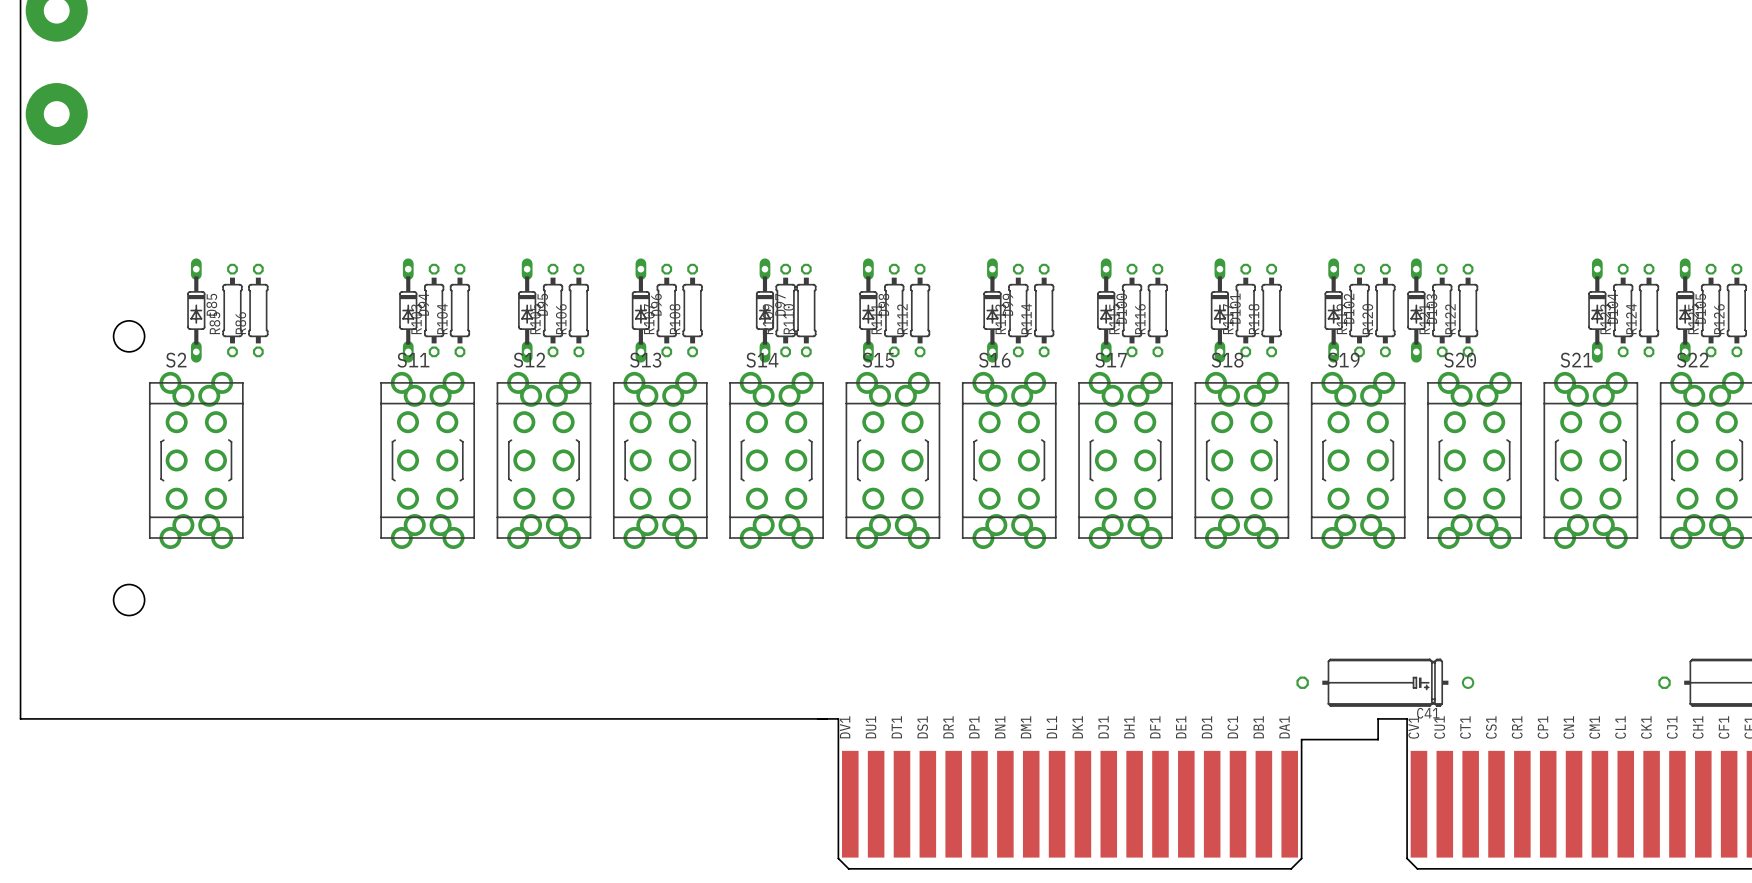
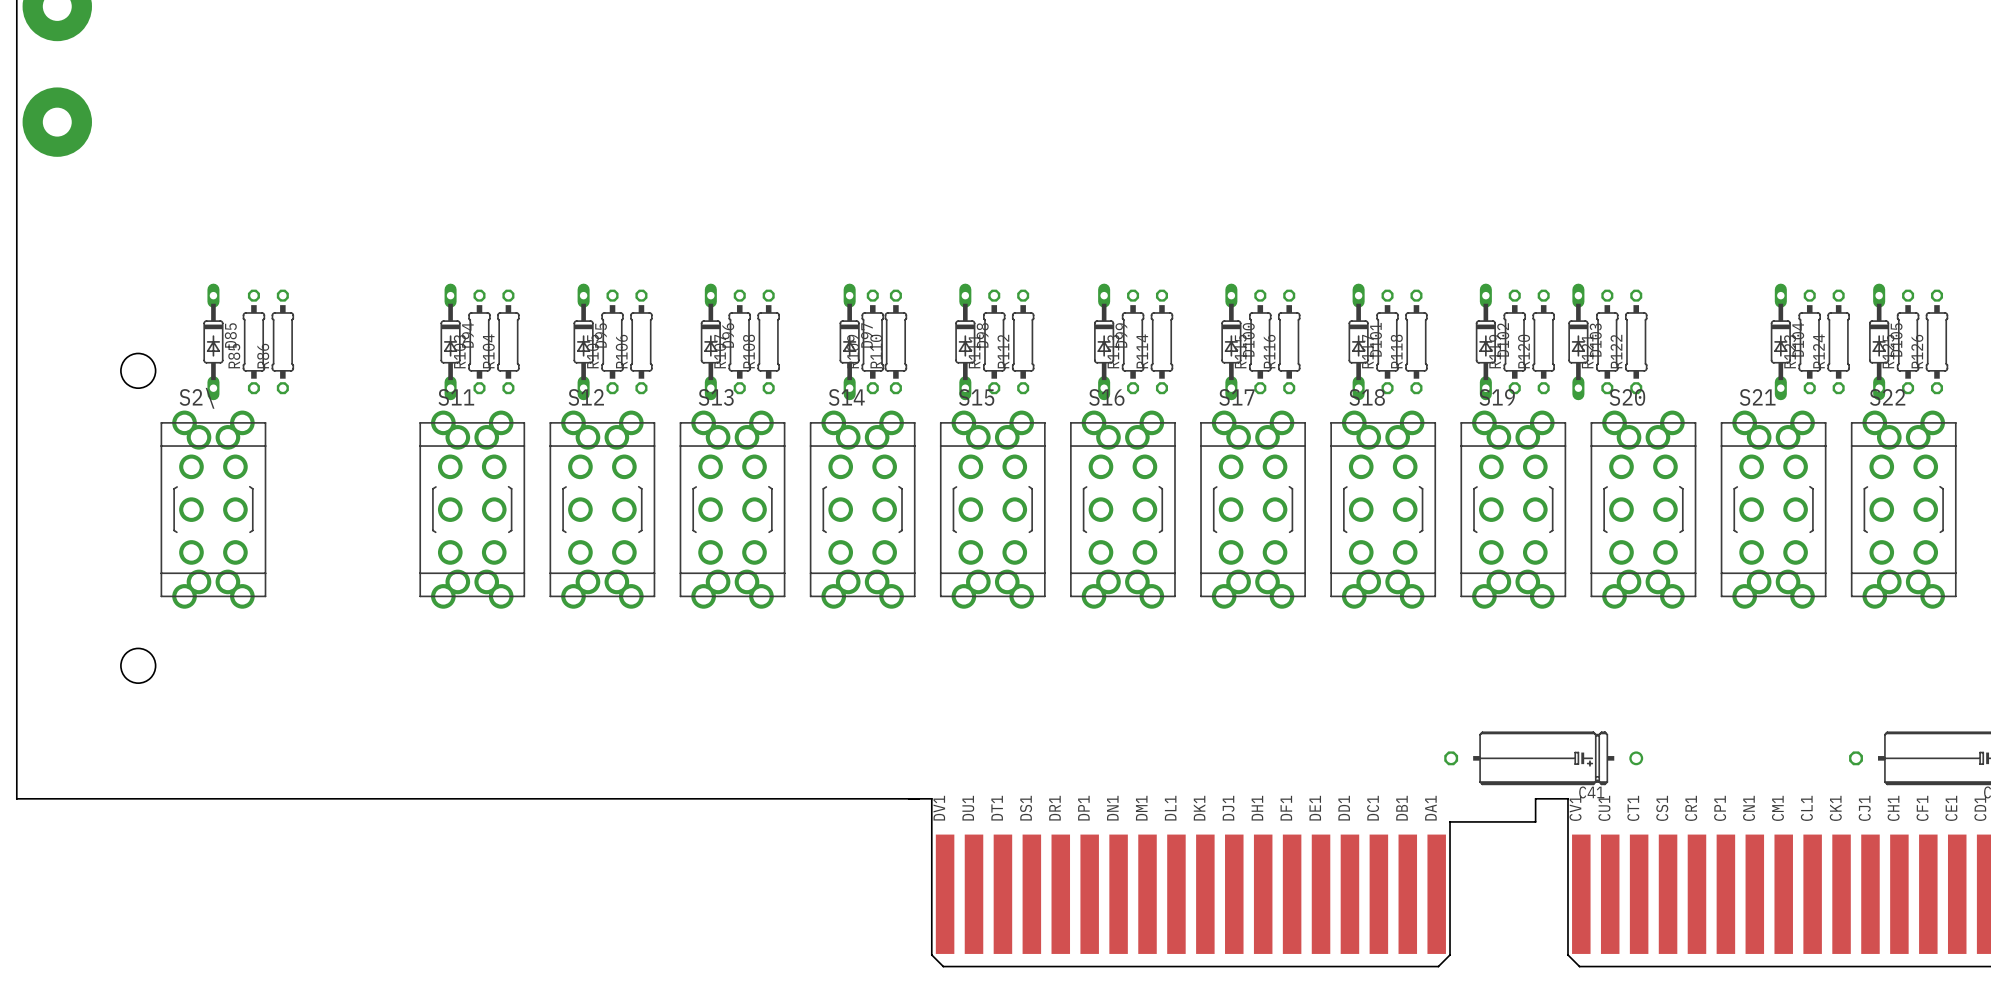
S2 name: S2 (176, 360) -> S2\ (197, 398)

